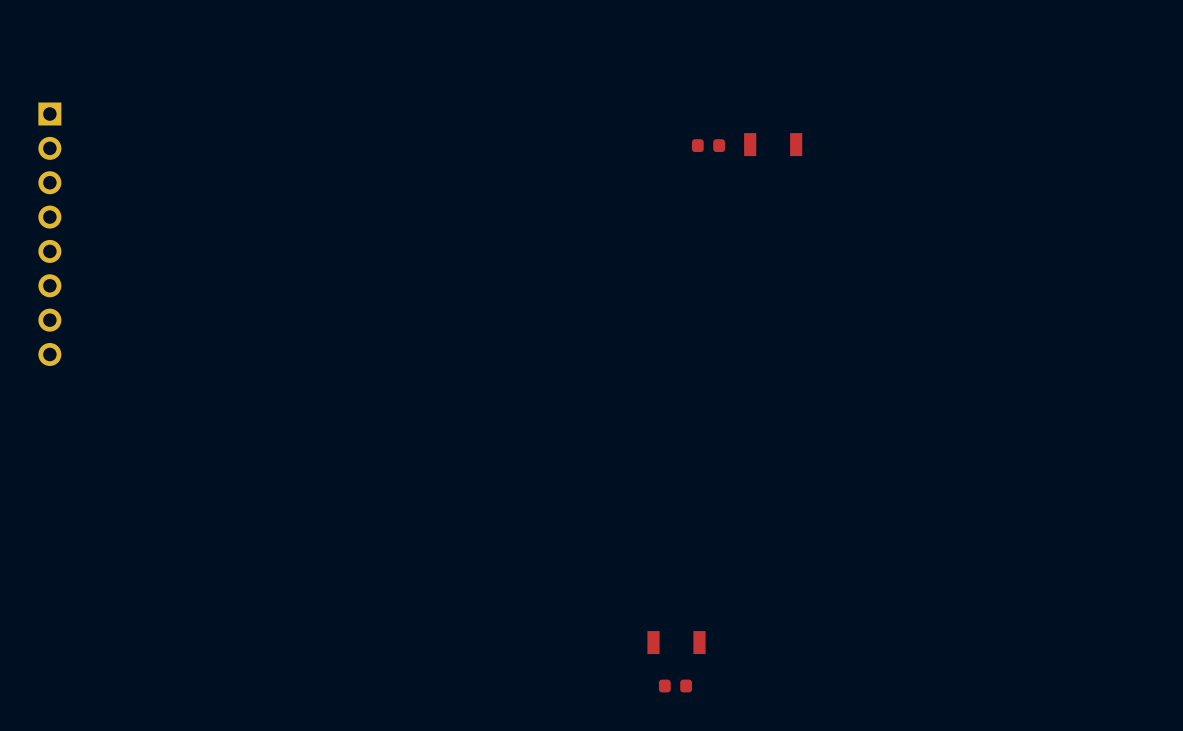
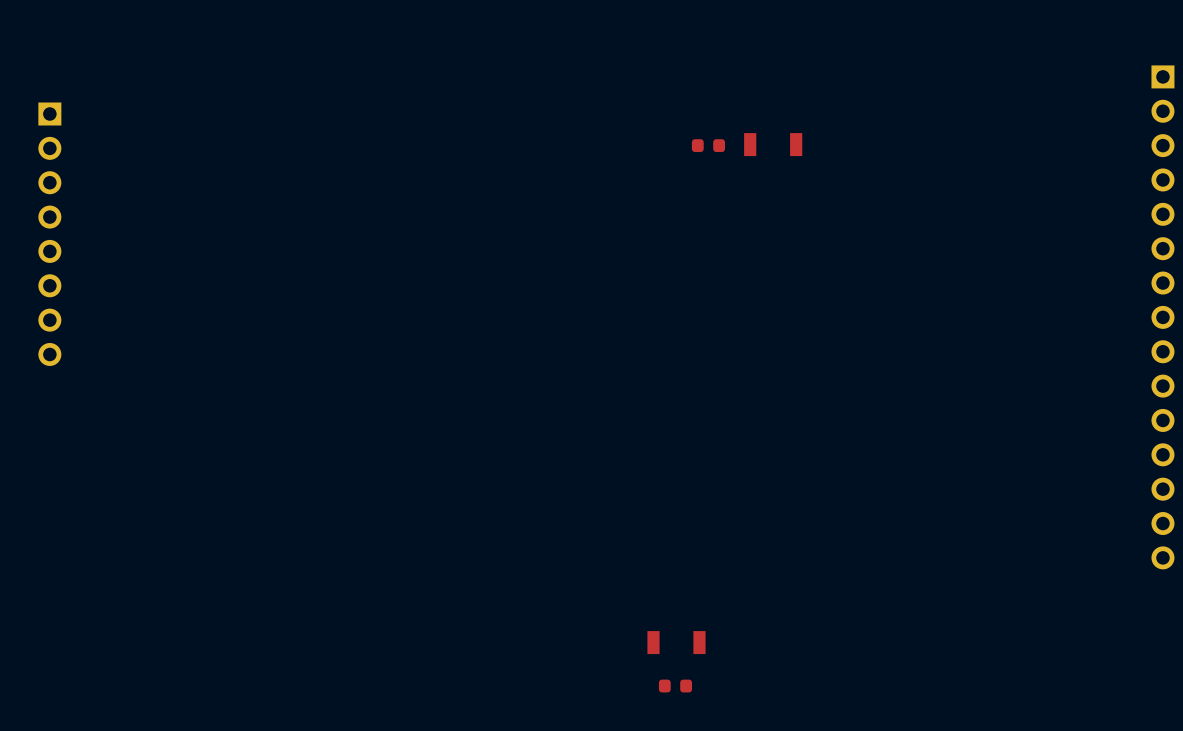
part: none -> (1162, 317)

